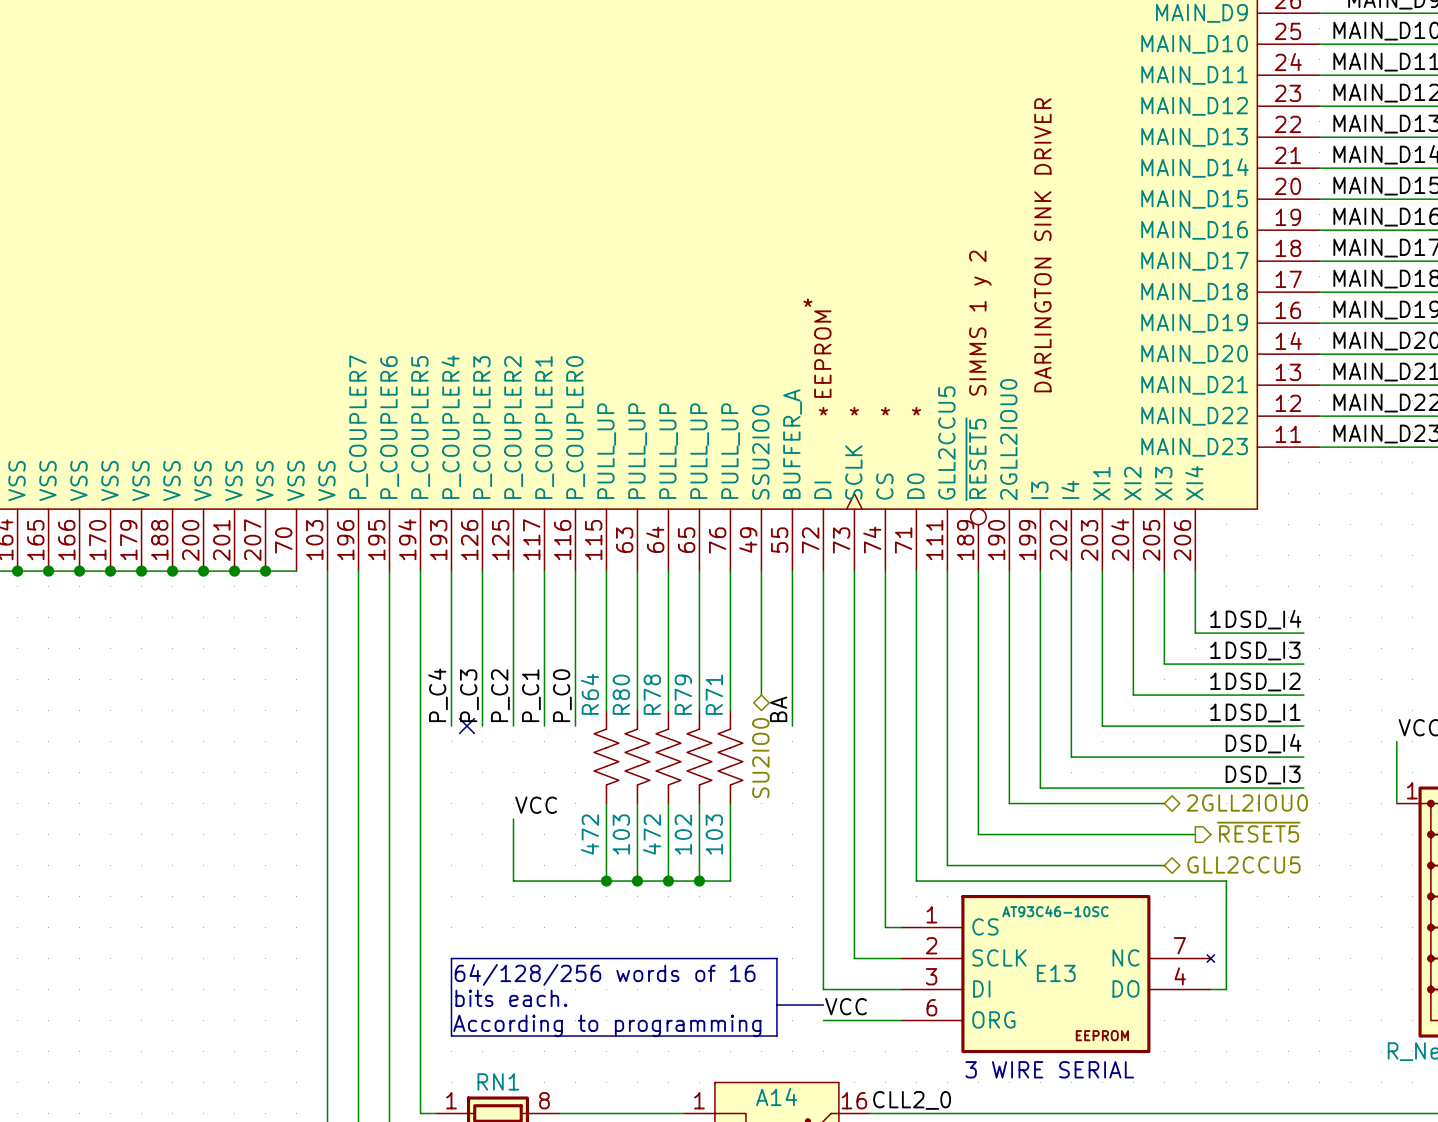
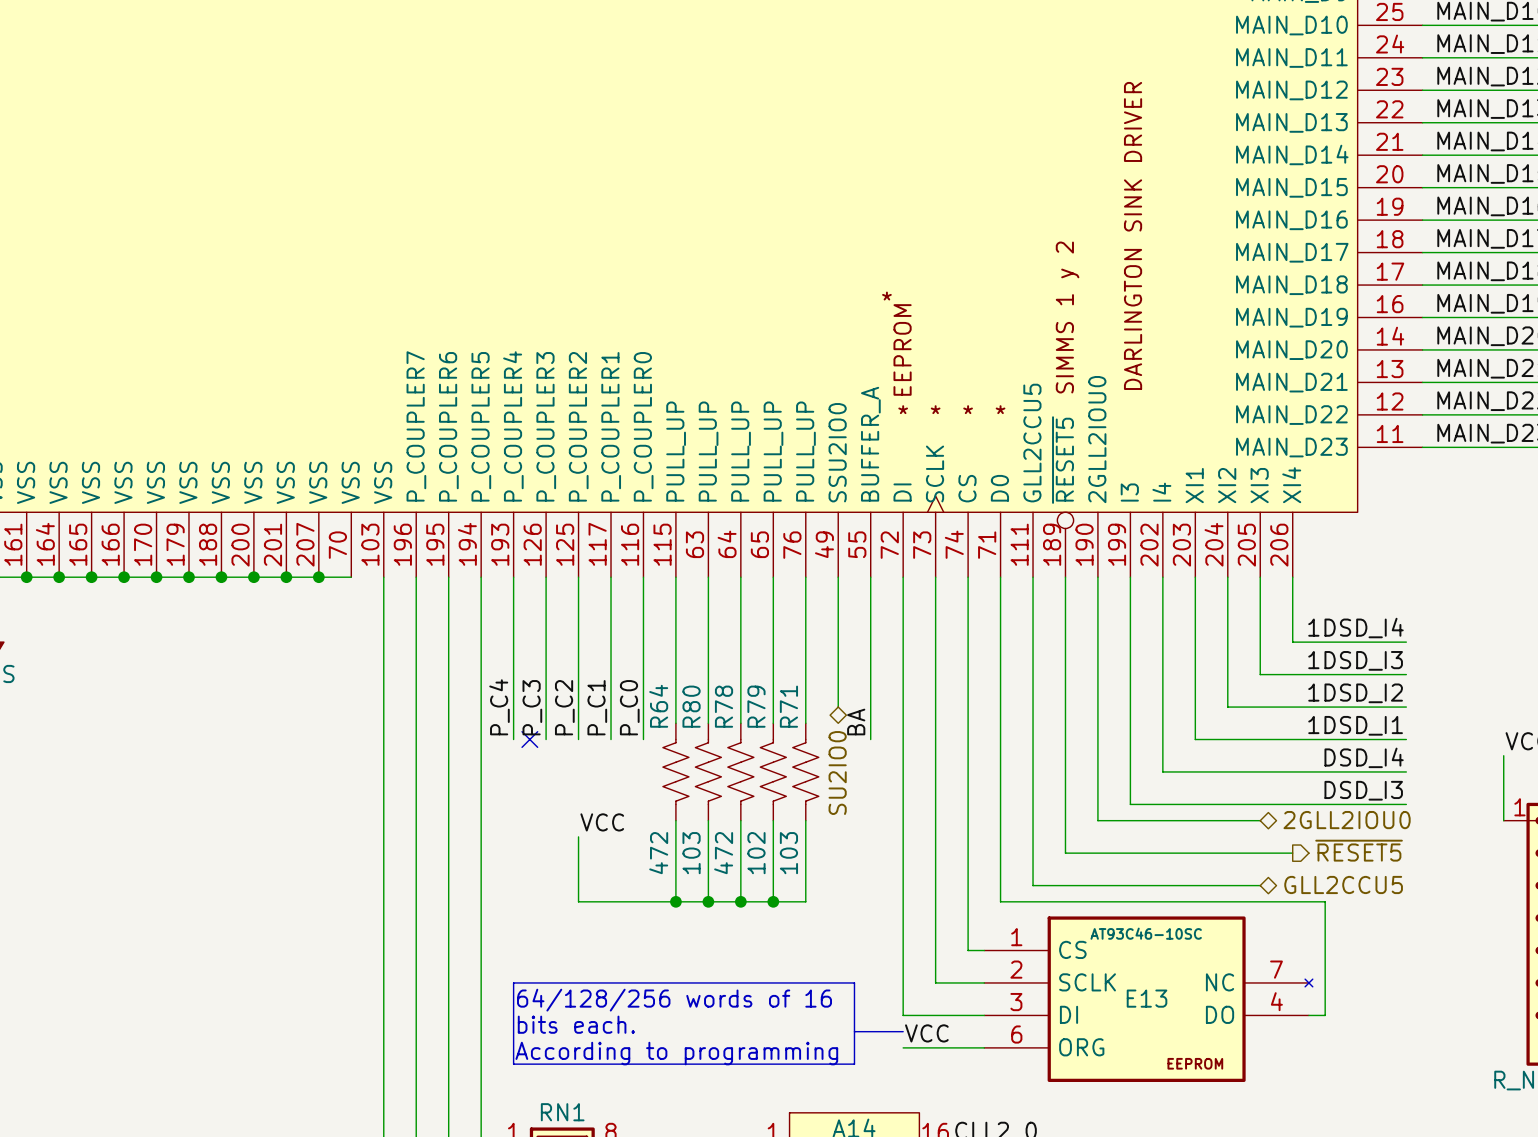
text: 3 WIRE SERIAL (1049, 1069) -> none

